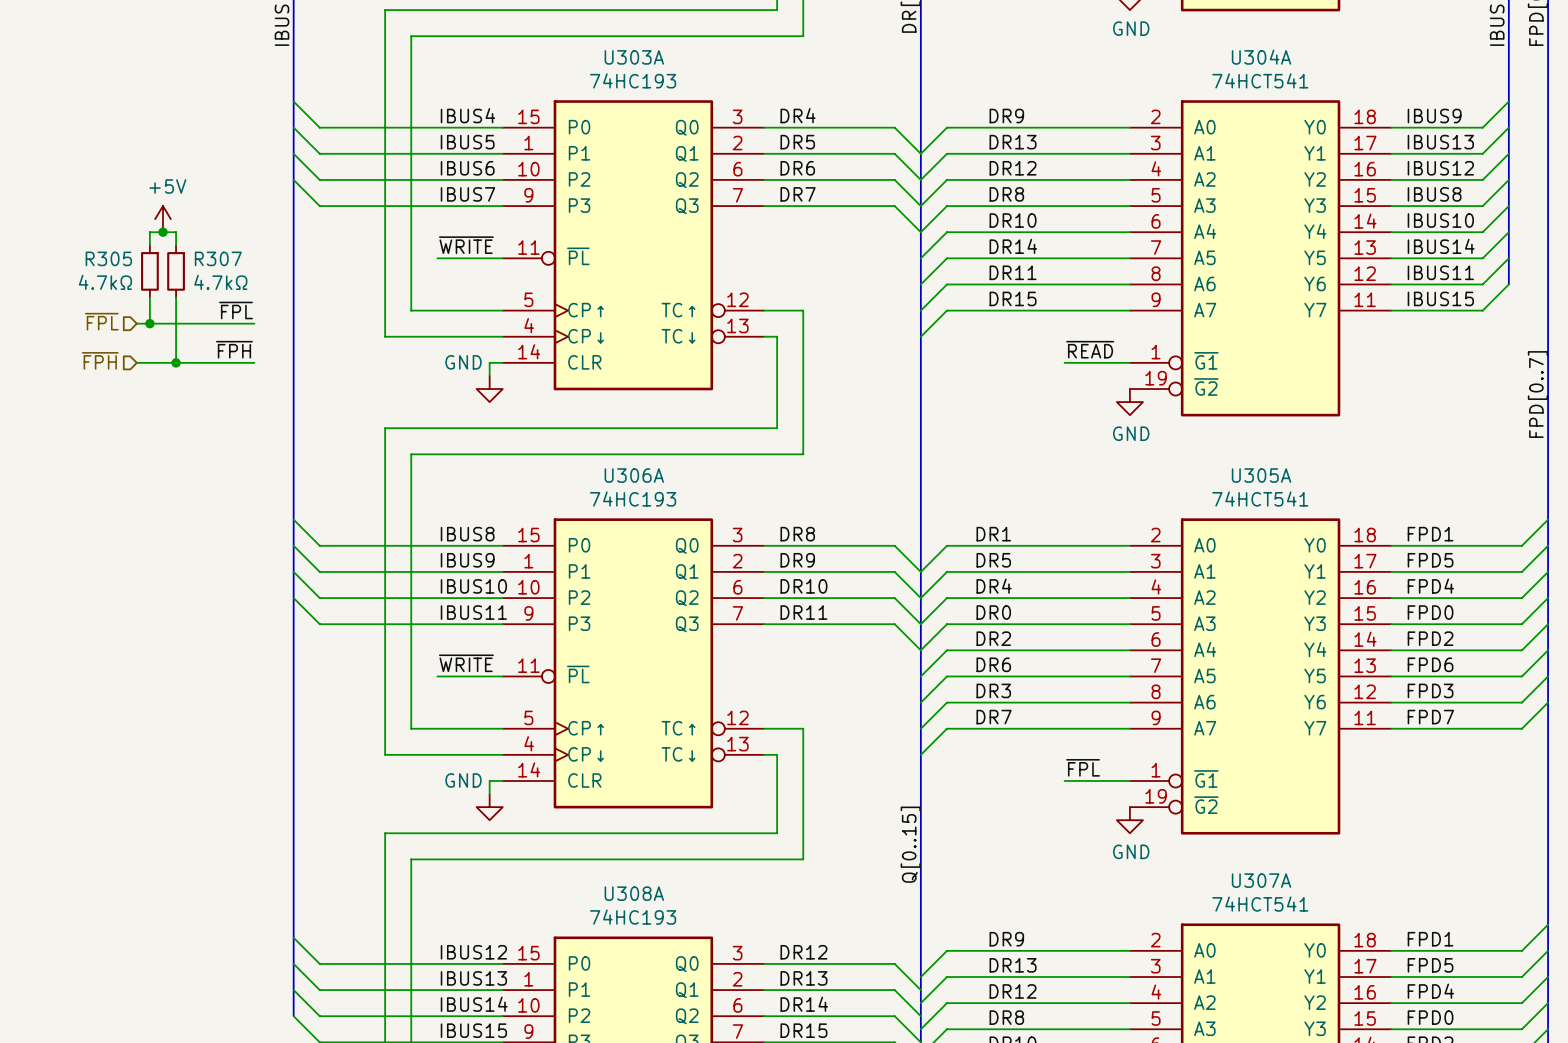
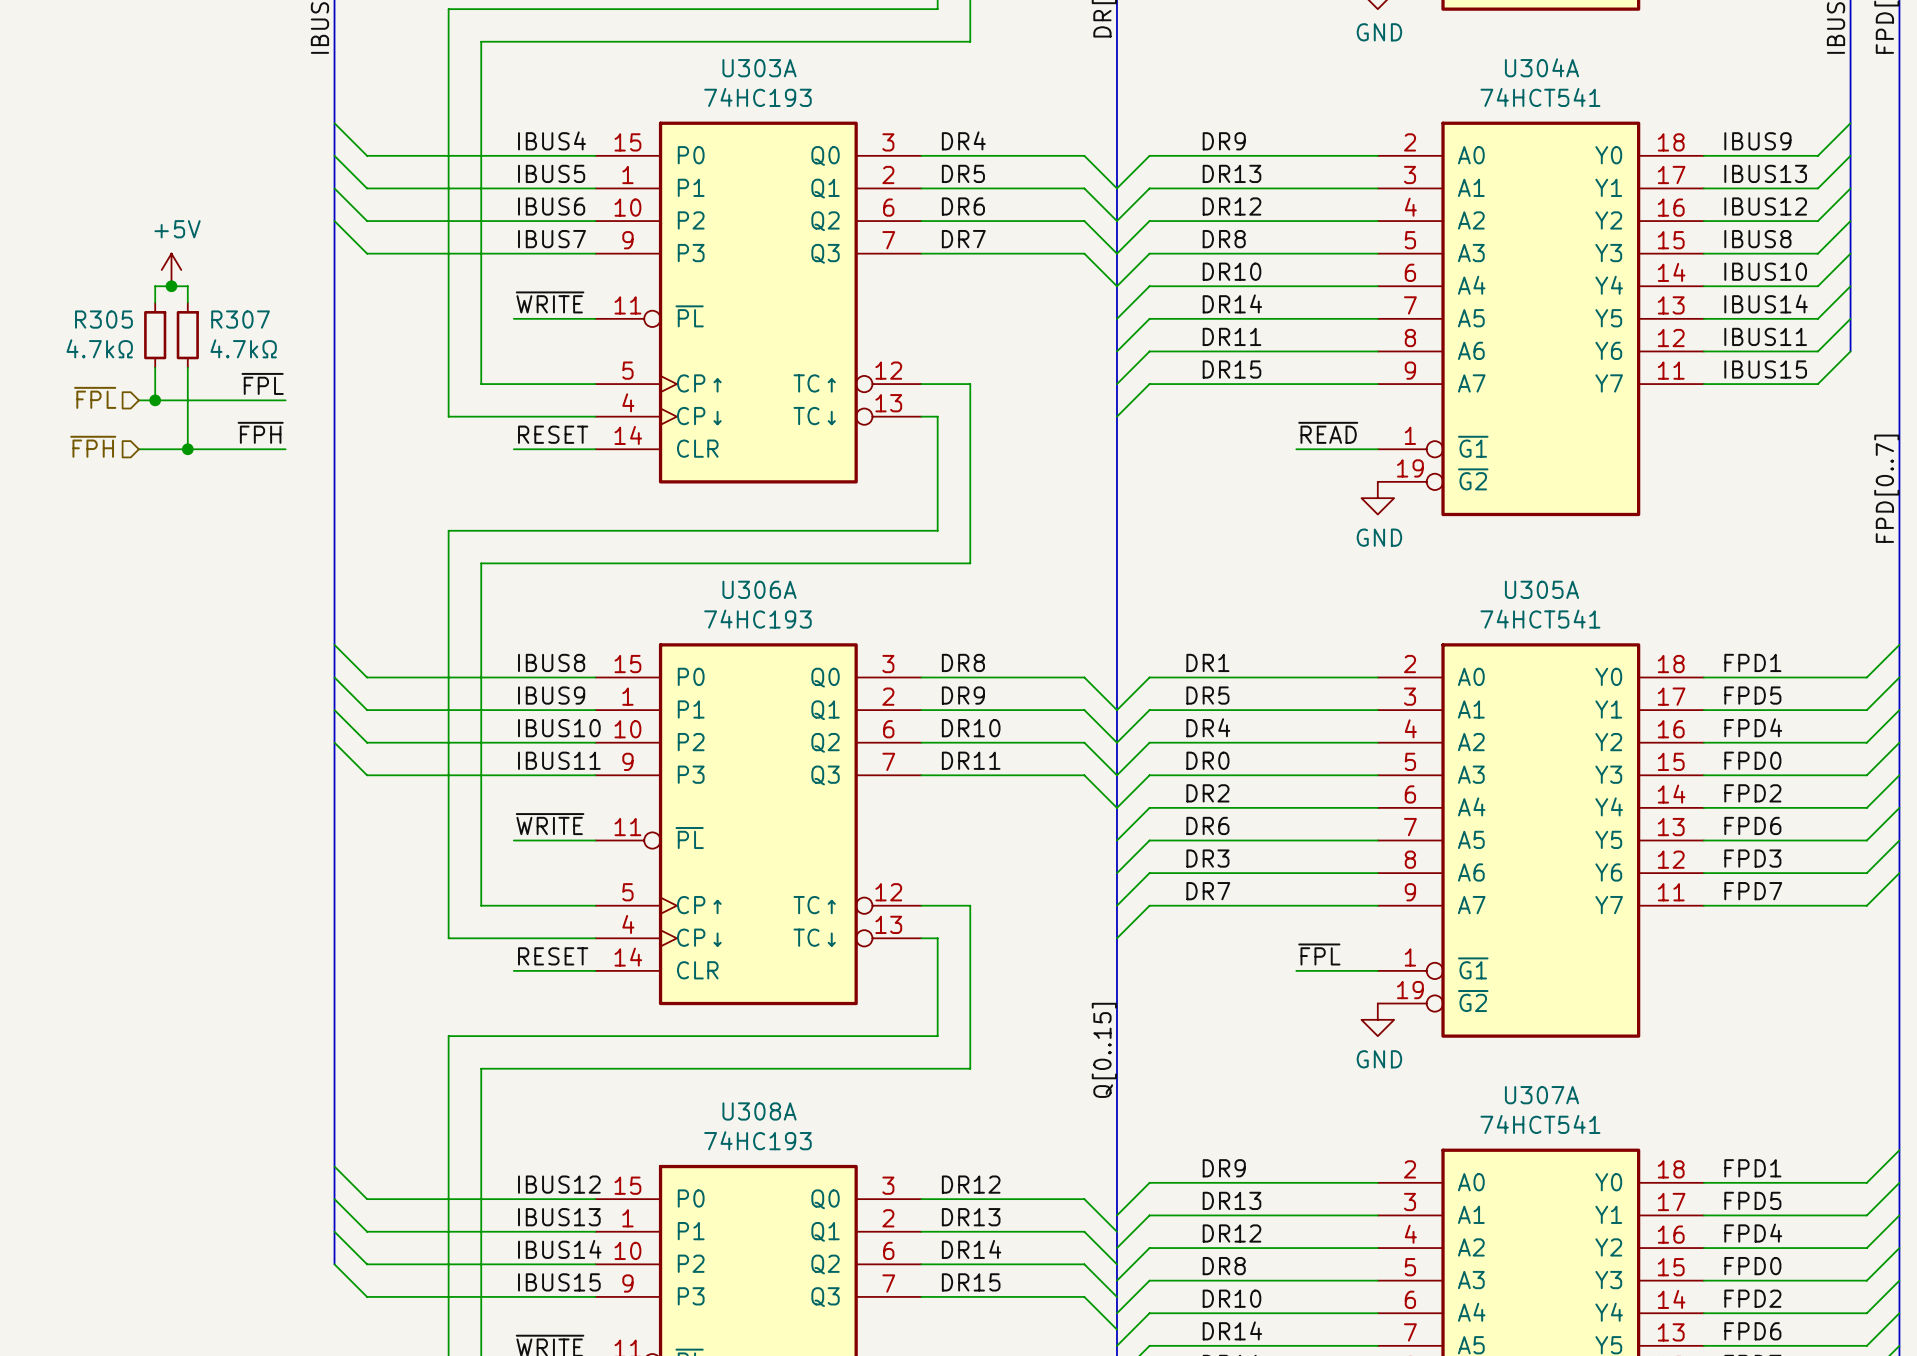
label: none -> RESET (553, 434)
wire: (489, 362) (489, 375) -> (579, 449) (513, 449)
power symbol: GND (489, 389) -> none
label: none -> RESET (553, 956)
wire: (489, 781) (489, 794) -> (579, 970) (513, 970)
power symbol: GND (489, 807) -> none

